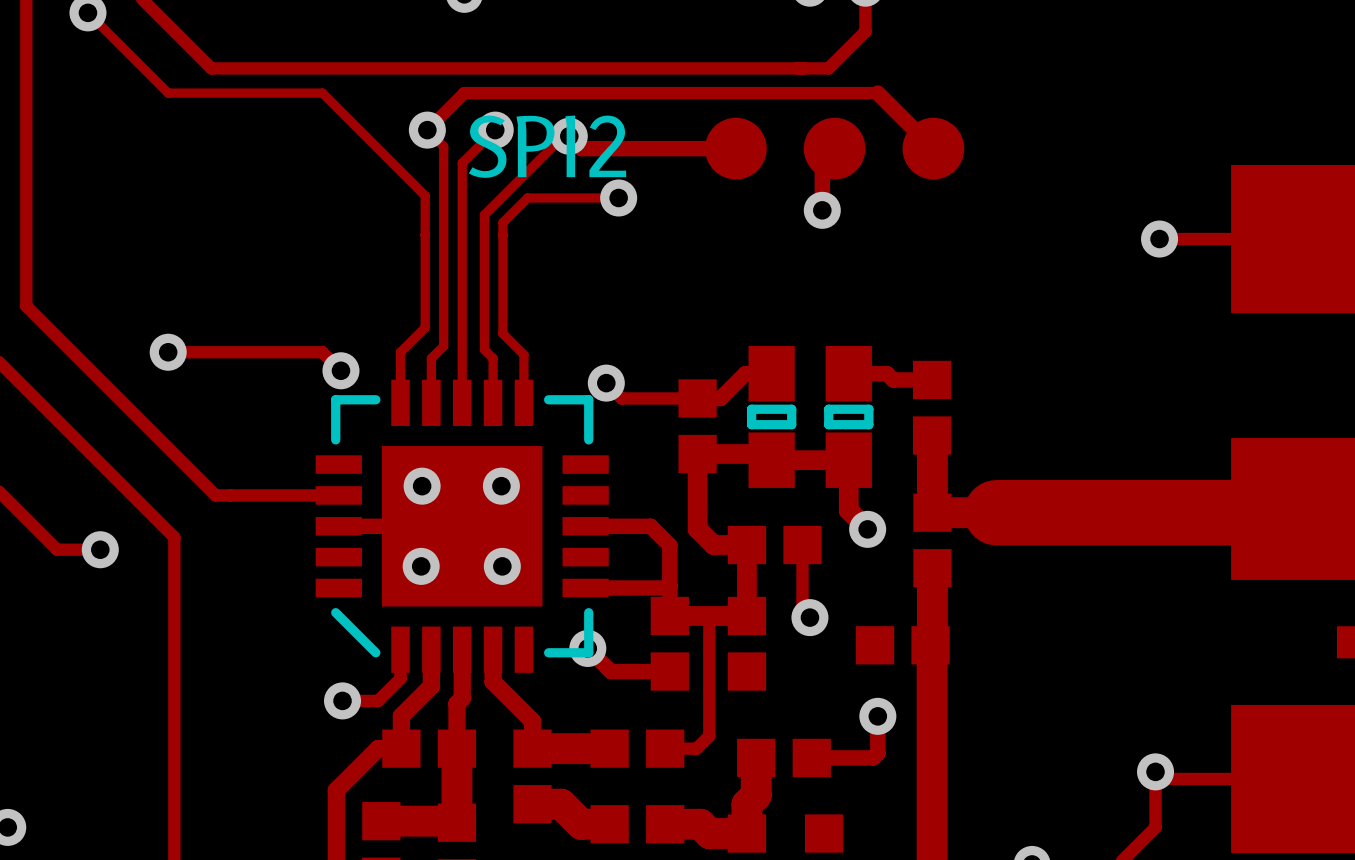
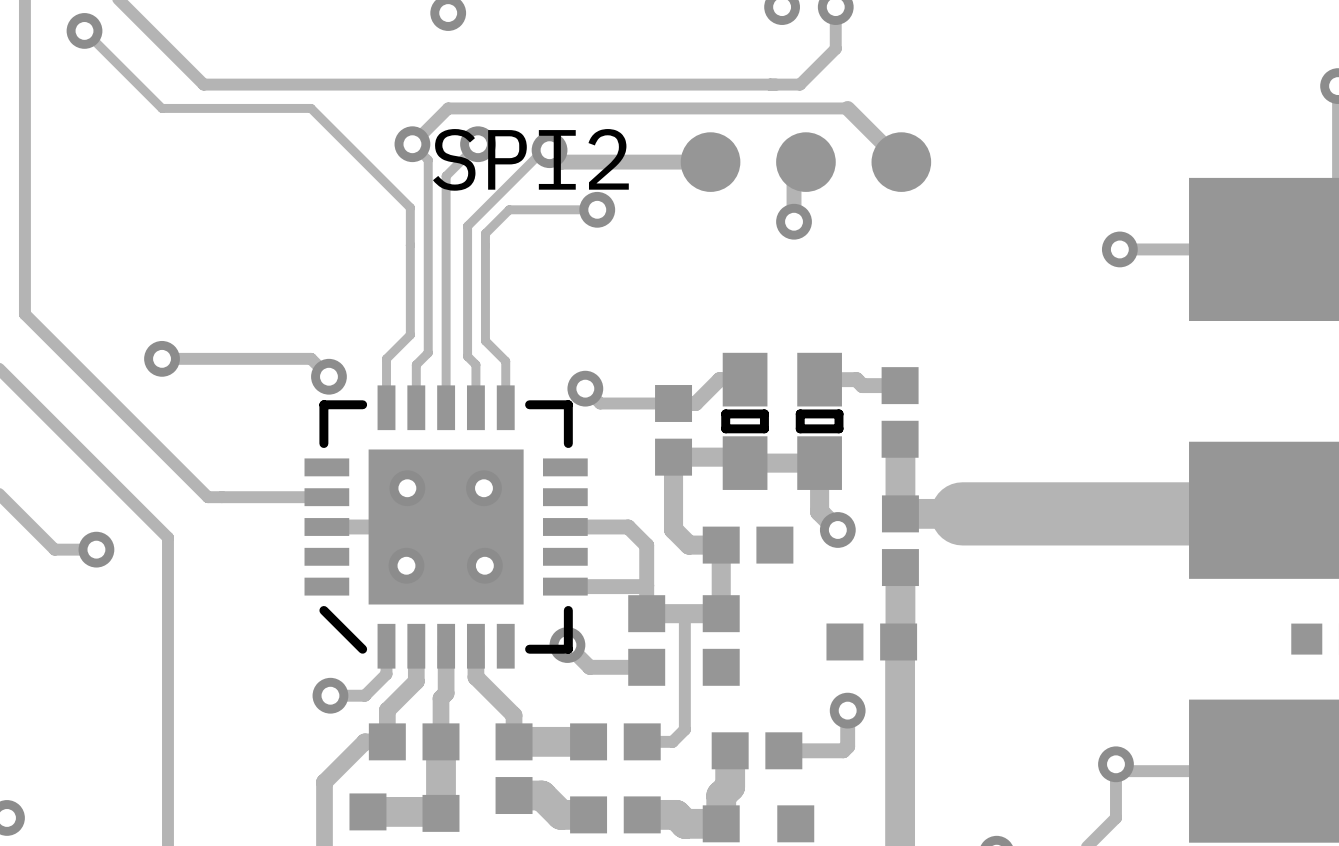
track: (802, 545) (802, 610) (809, 617) -> none
via: (809, 617) -> none

